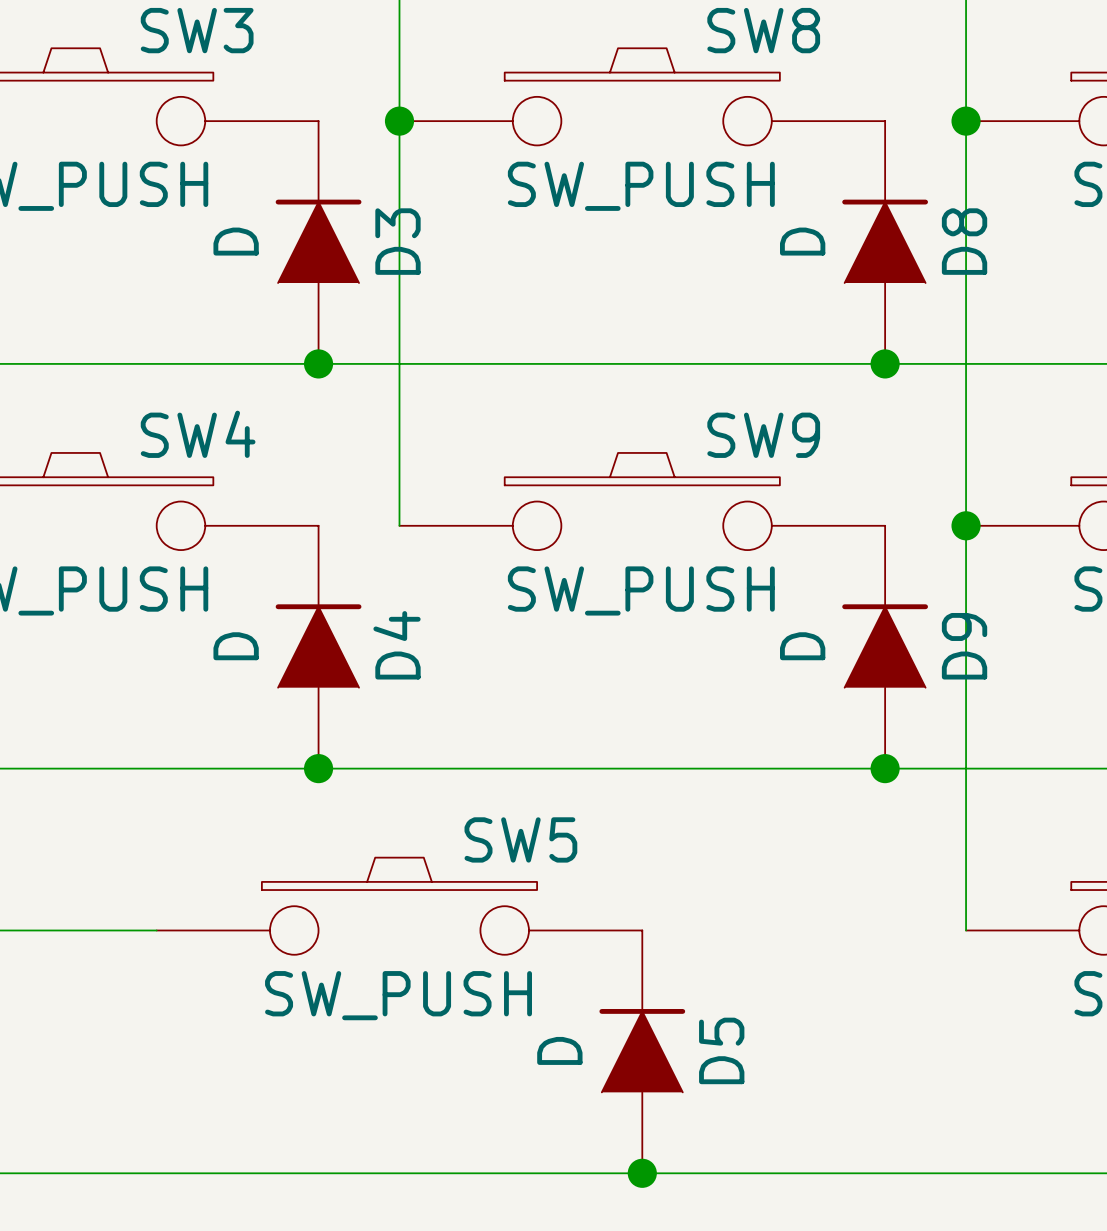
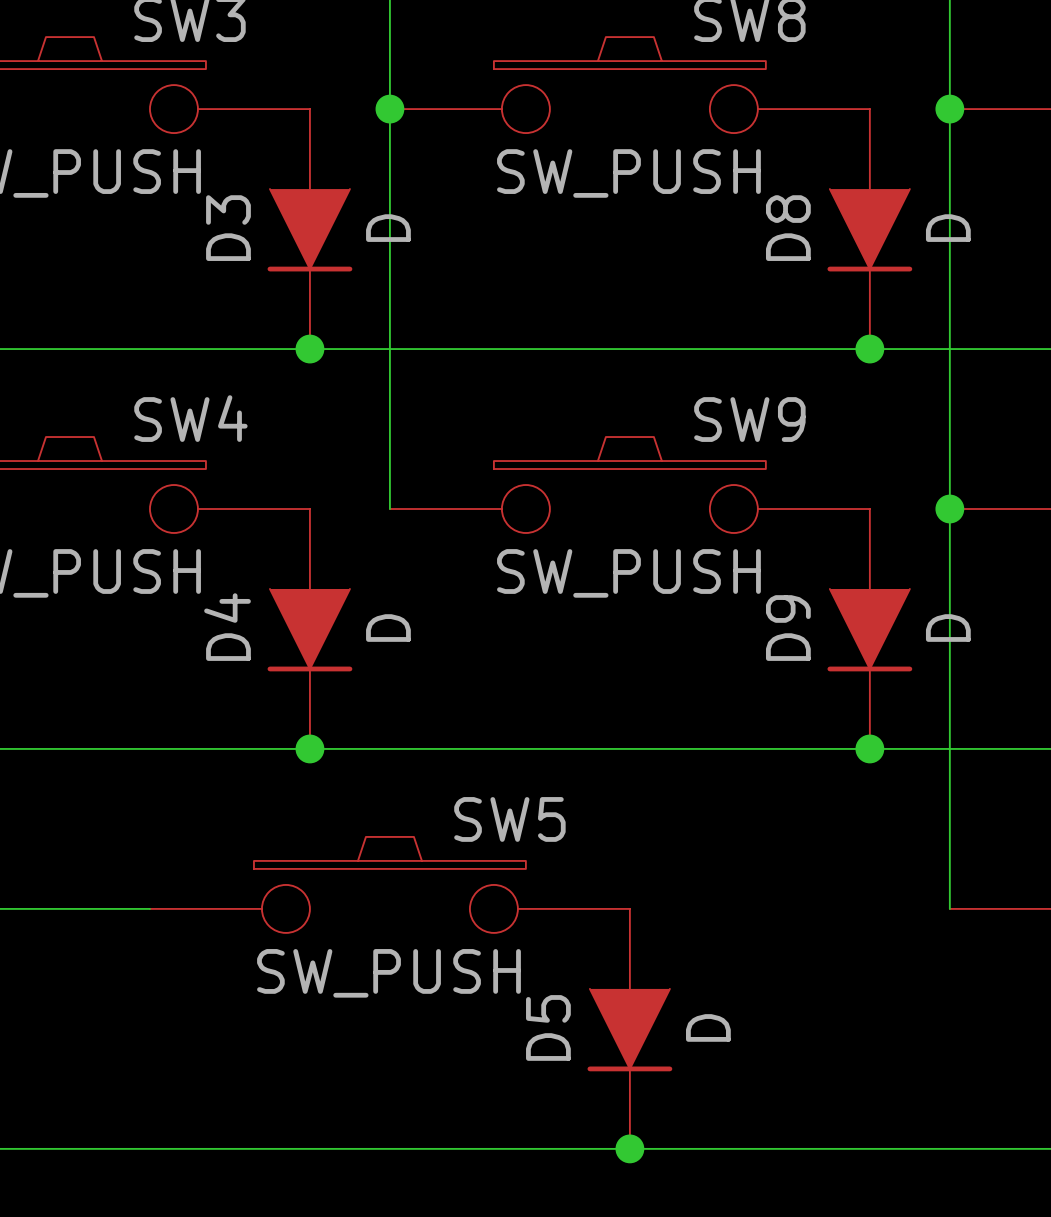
D3 rotation: 0° (318, 241) -> 180° (309, 230)
D8 rotation: 0° (885, 241) -> 180° (869, 230)
D4 rotation: 0° (318, 646) -> 180° (309, 630)
D9 rotation: 0° (885, 646) -> 180° (869, 630)
D5 rotation: 0° (642, 1050) -> 180° (629, 1030)

